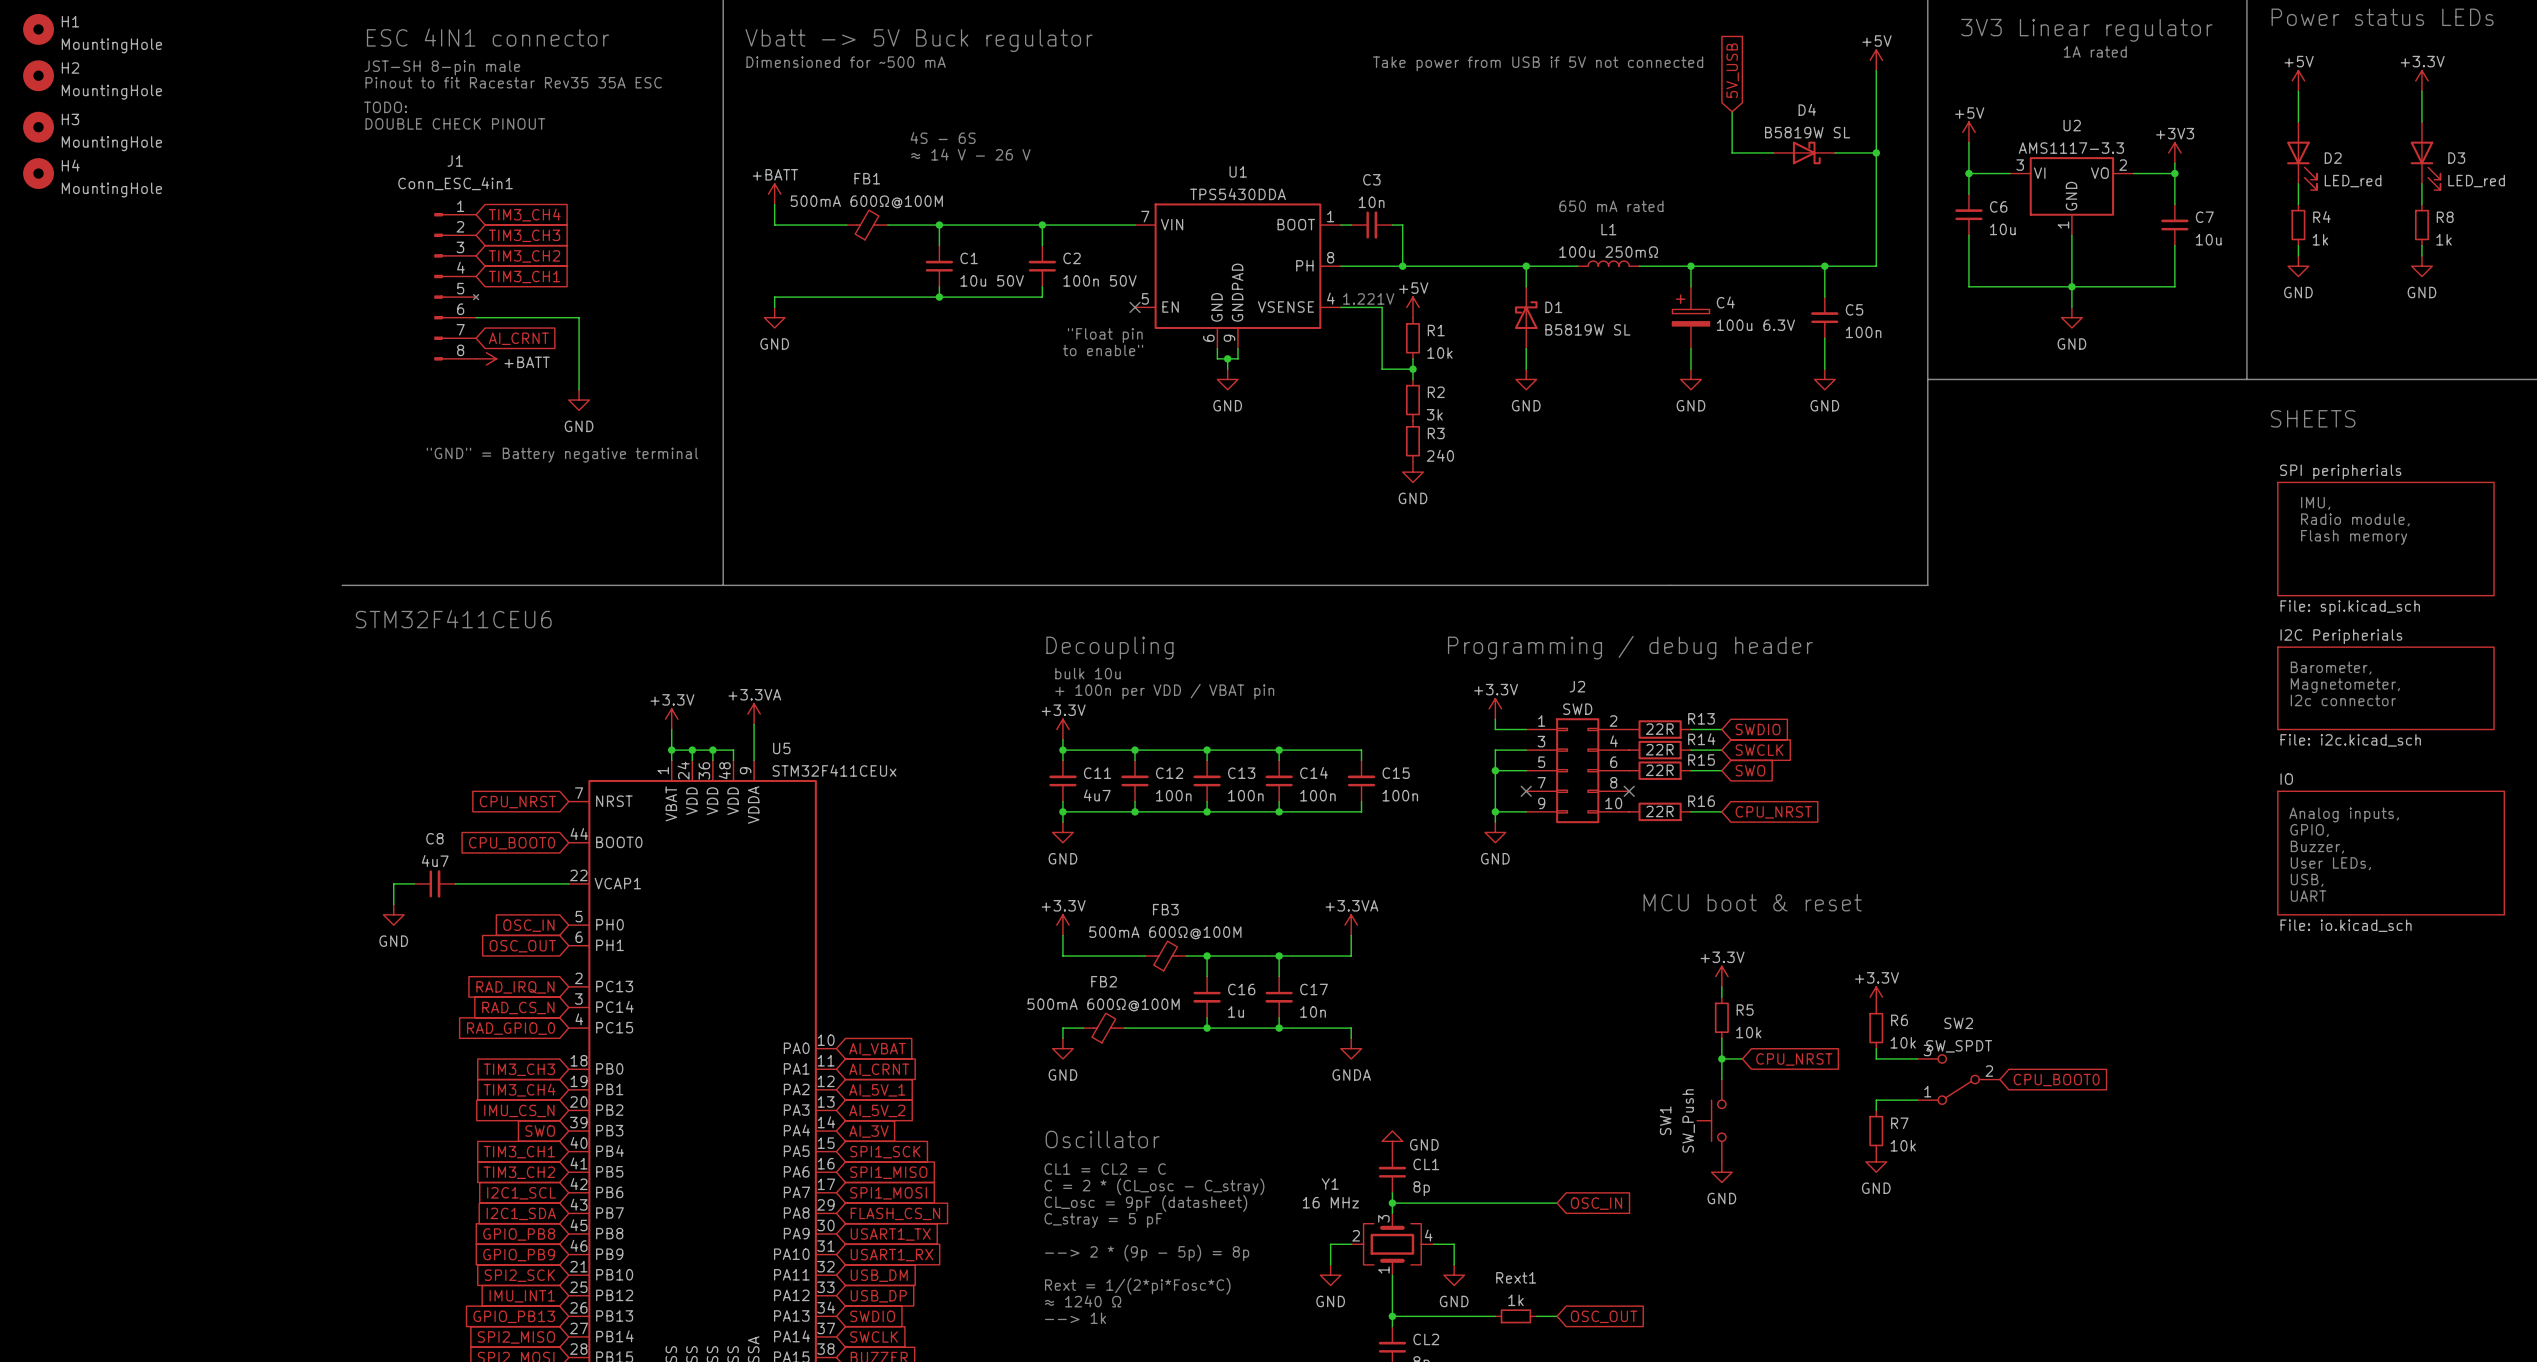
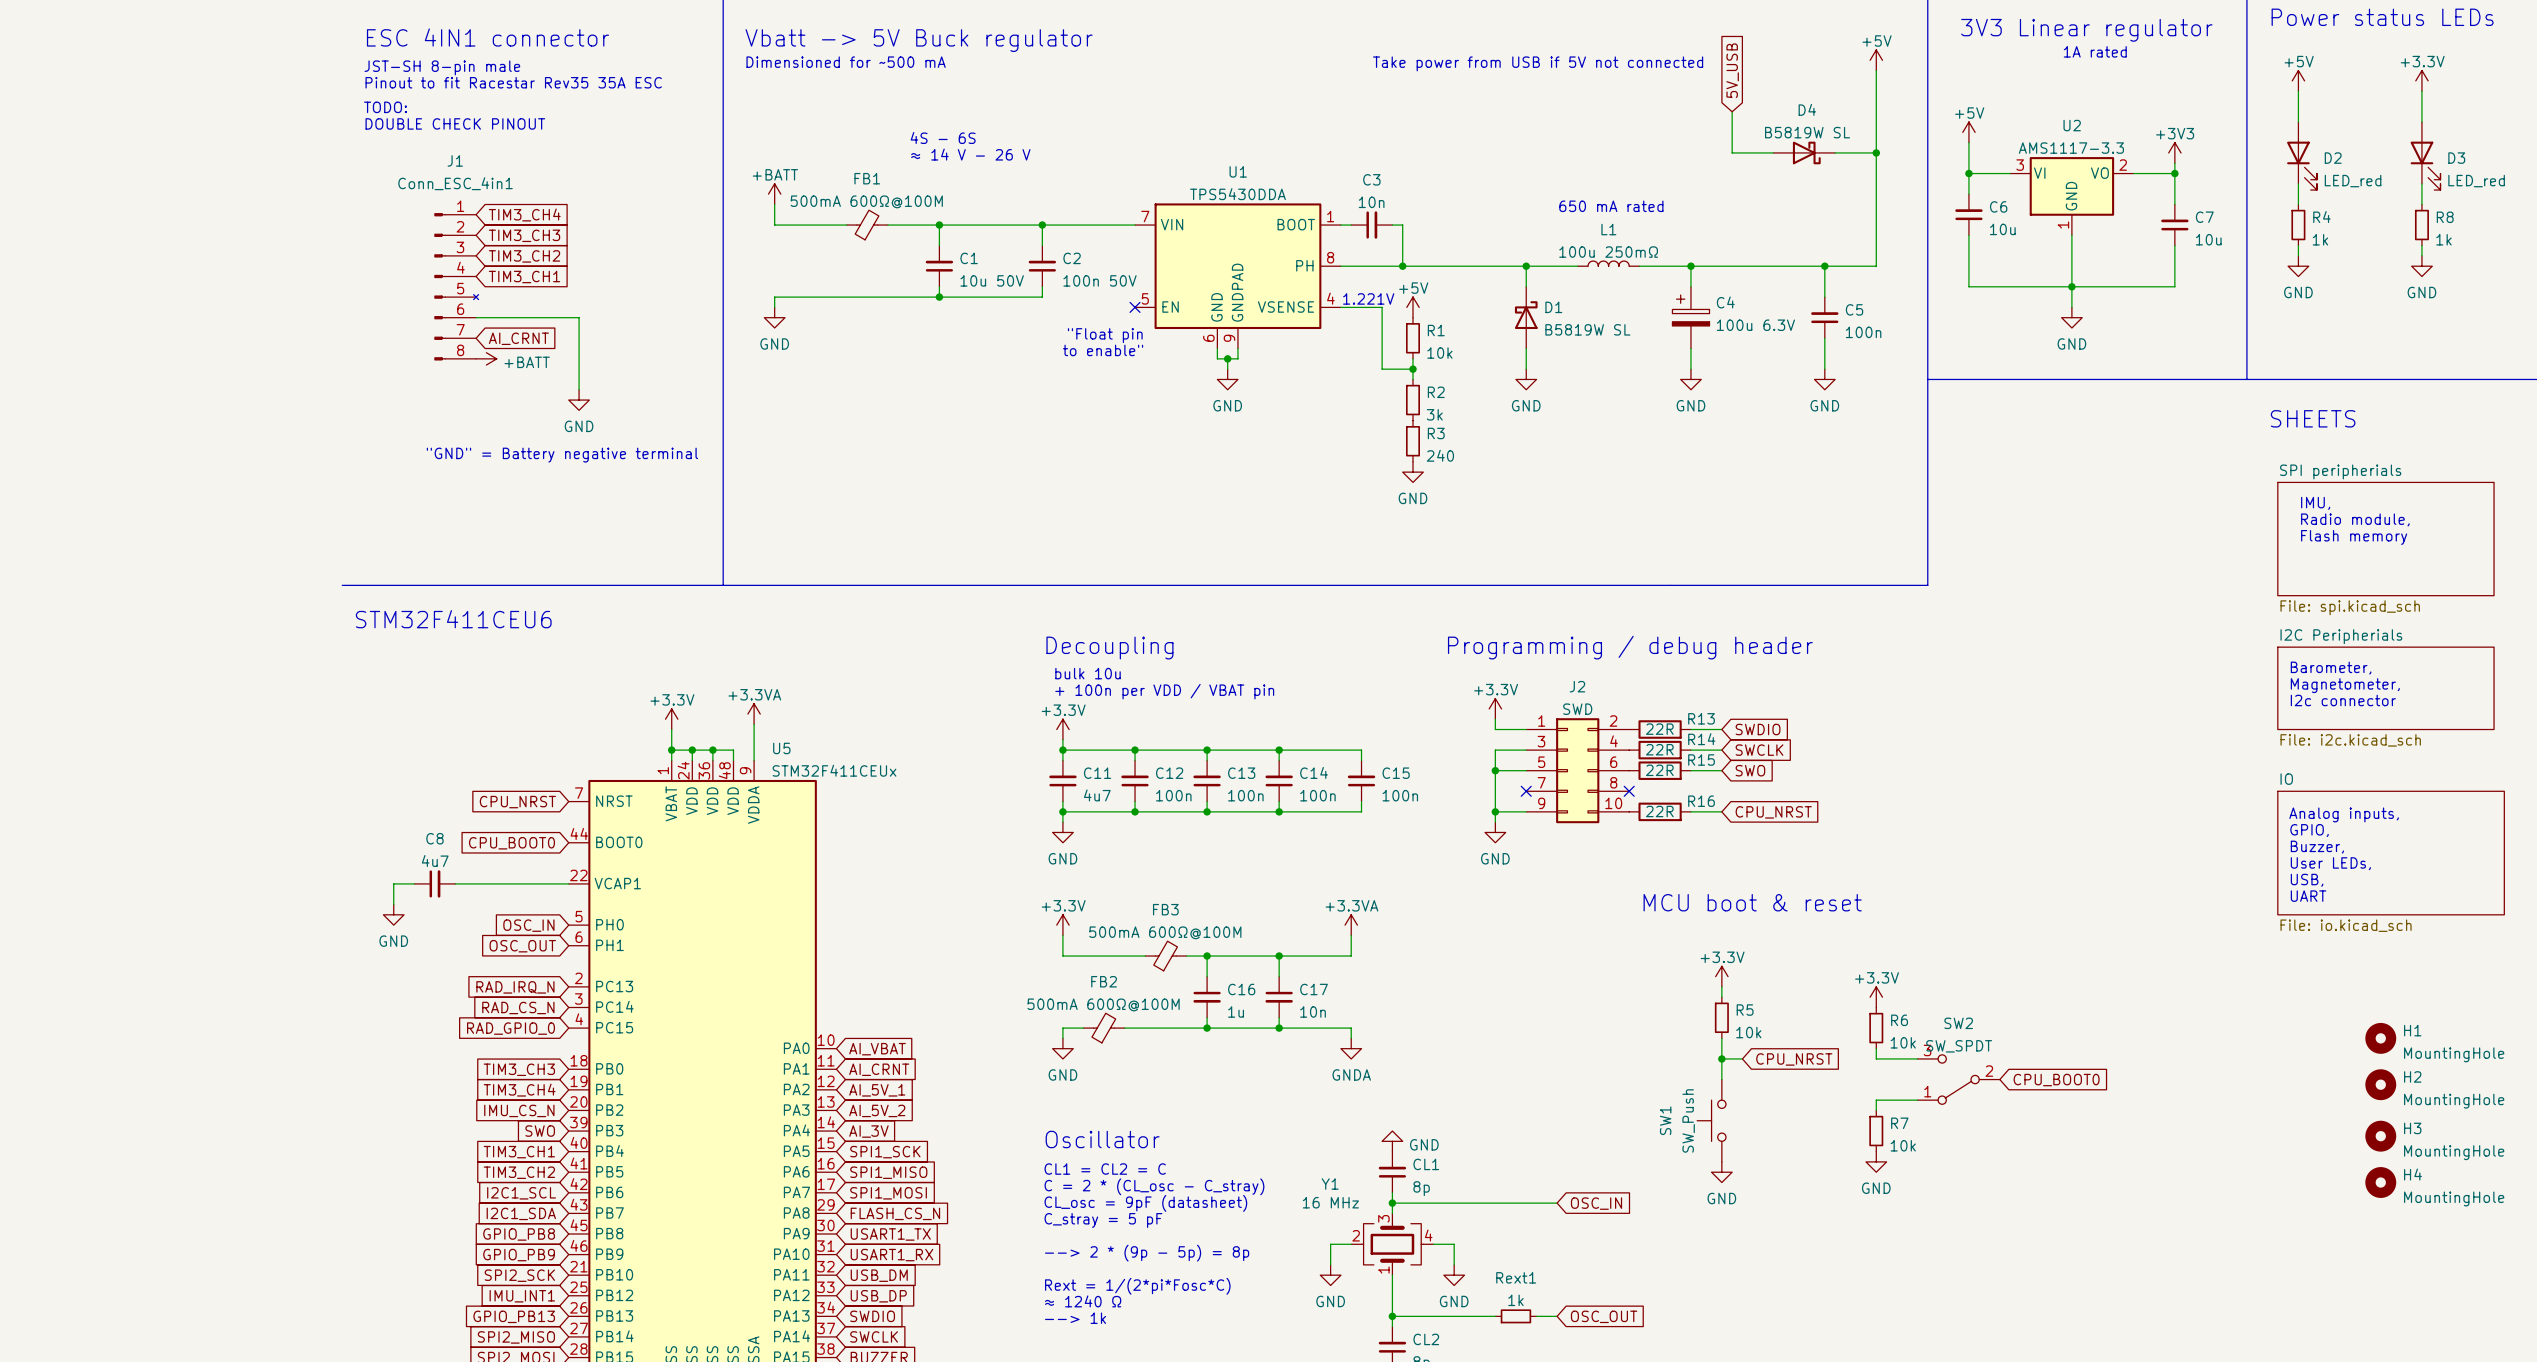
H1 position: (38, 29) -> (2380, 1038)
H2 position: (38, 75) -> (2380, 1084)
H3 position: (38, 127) -> (2380, 1136)
H4 position: (38, 173) -> (2380, 1182)

